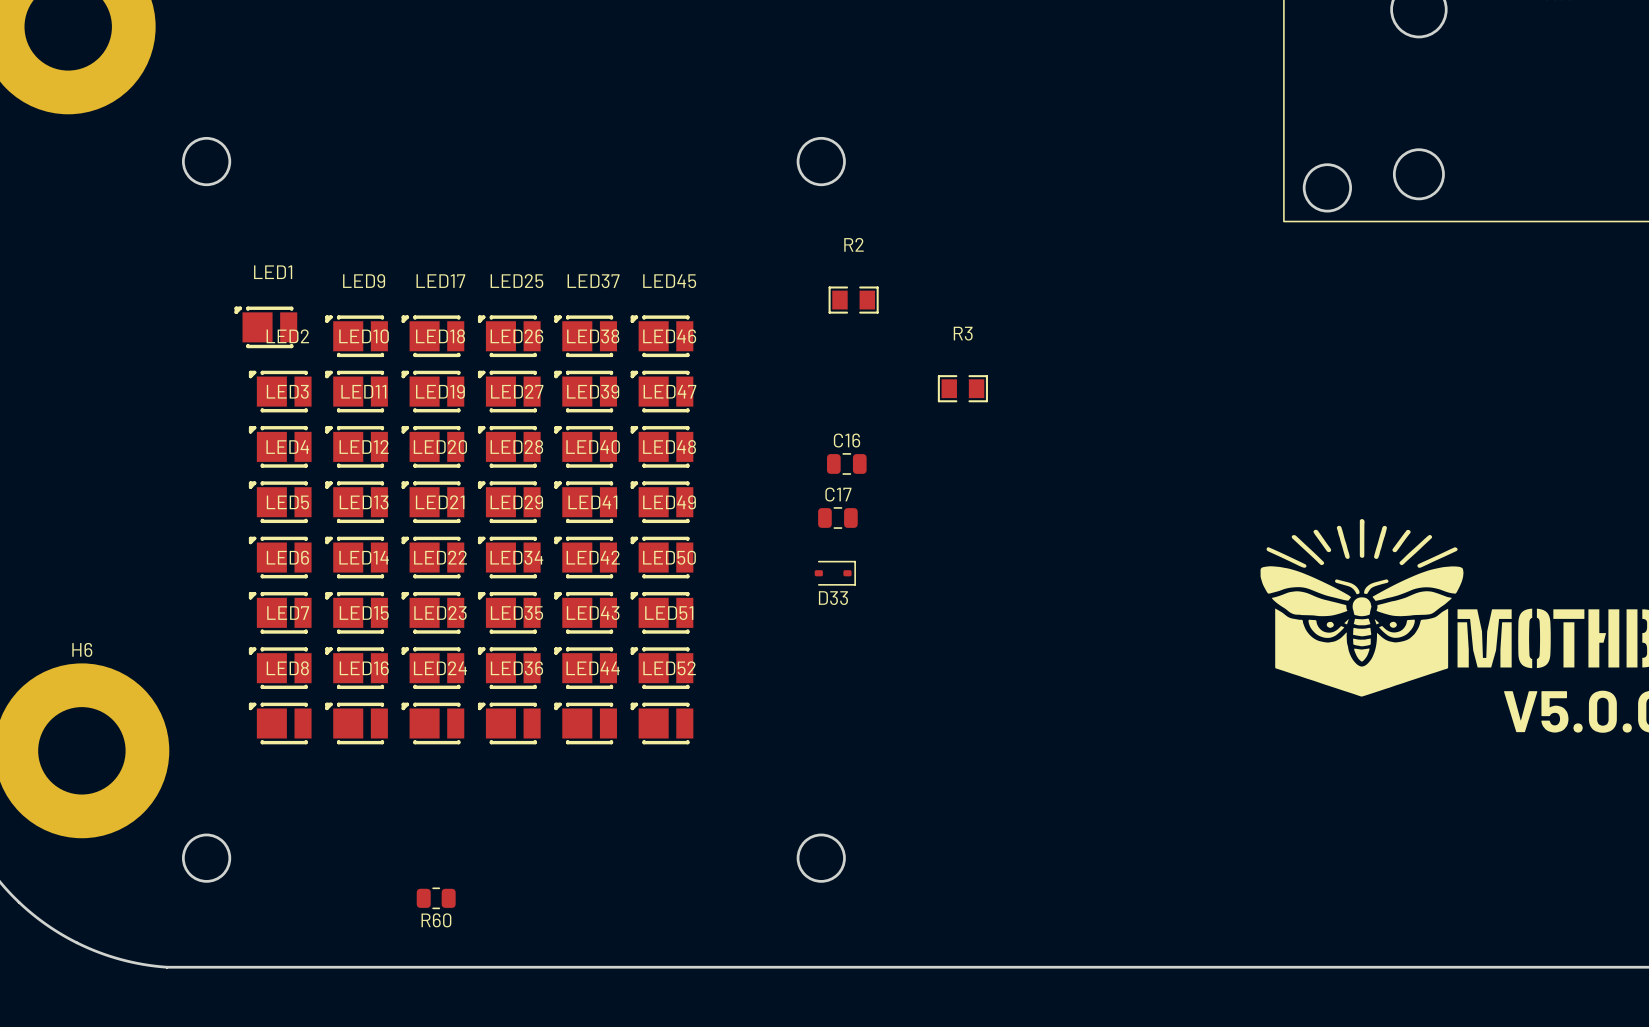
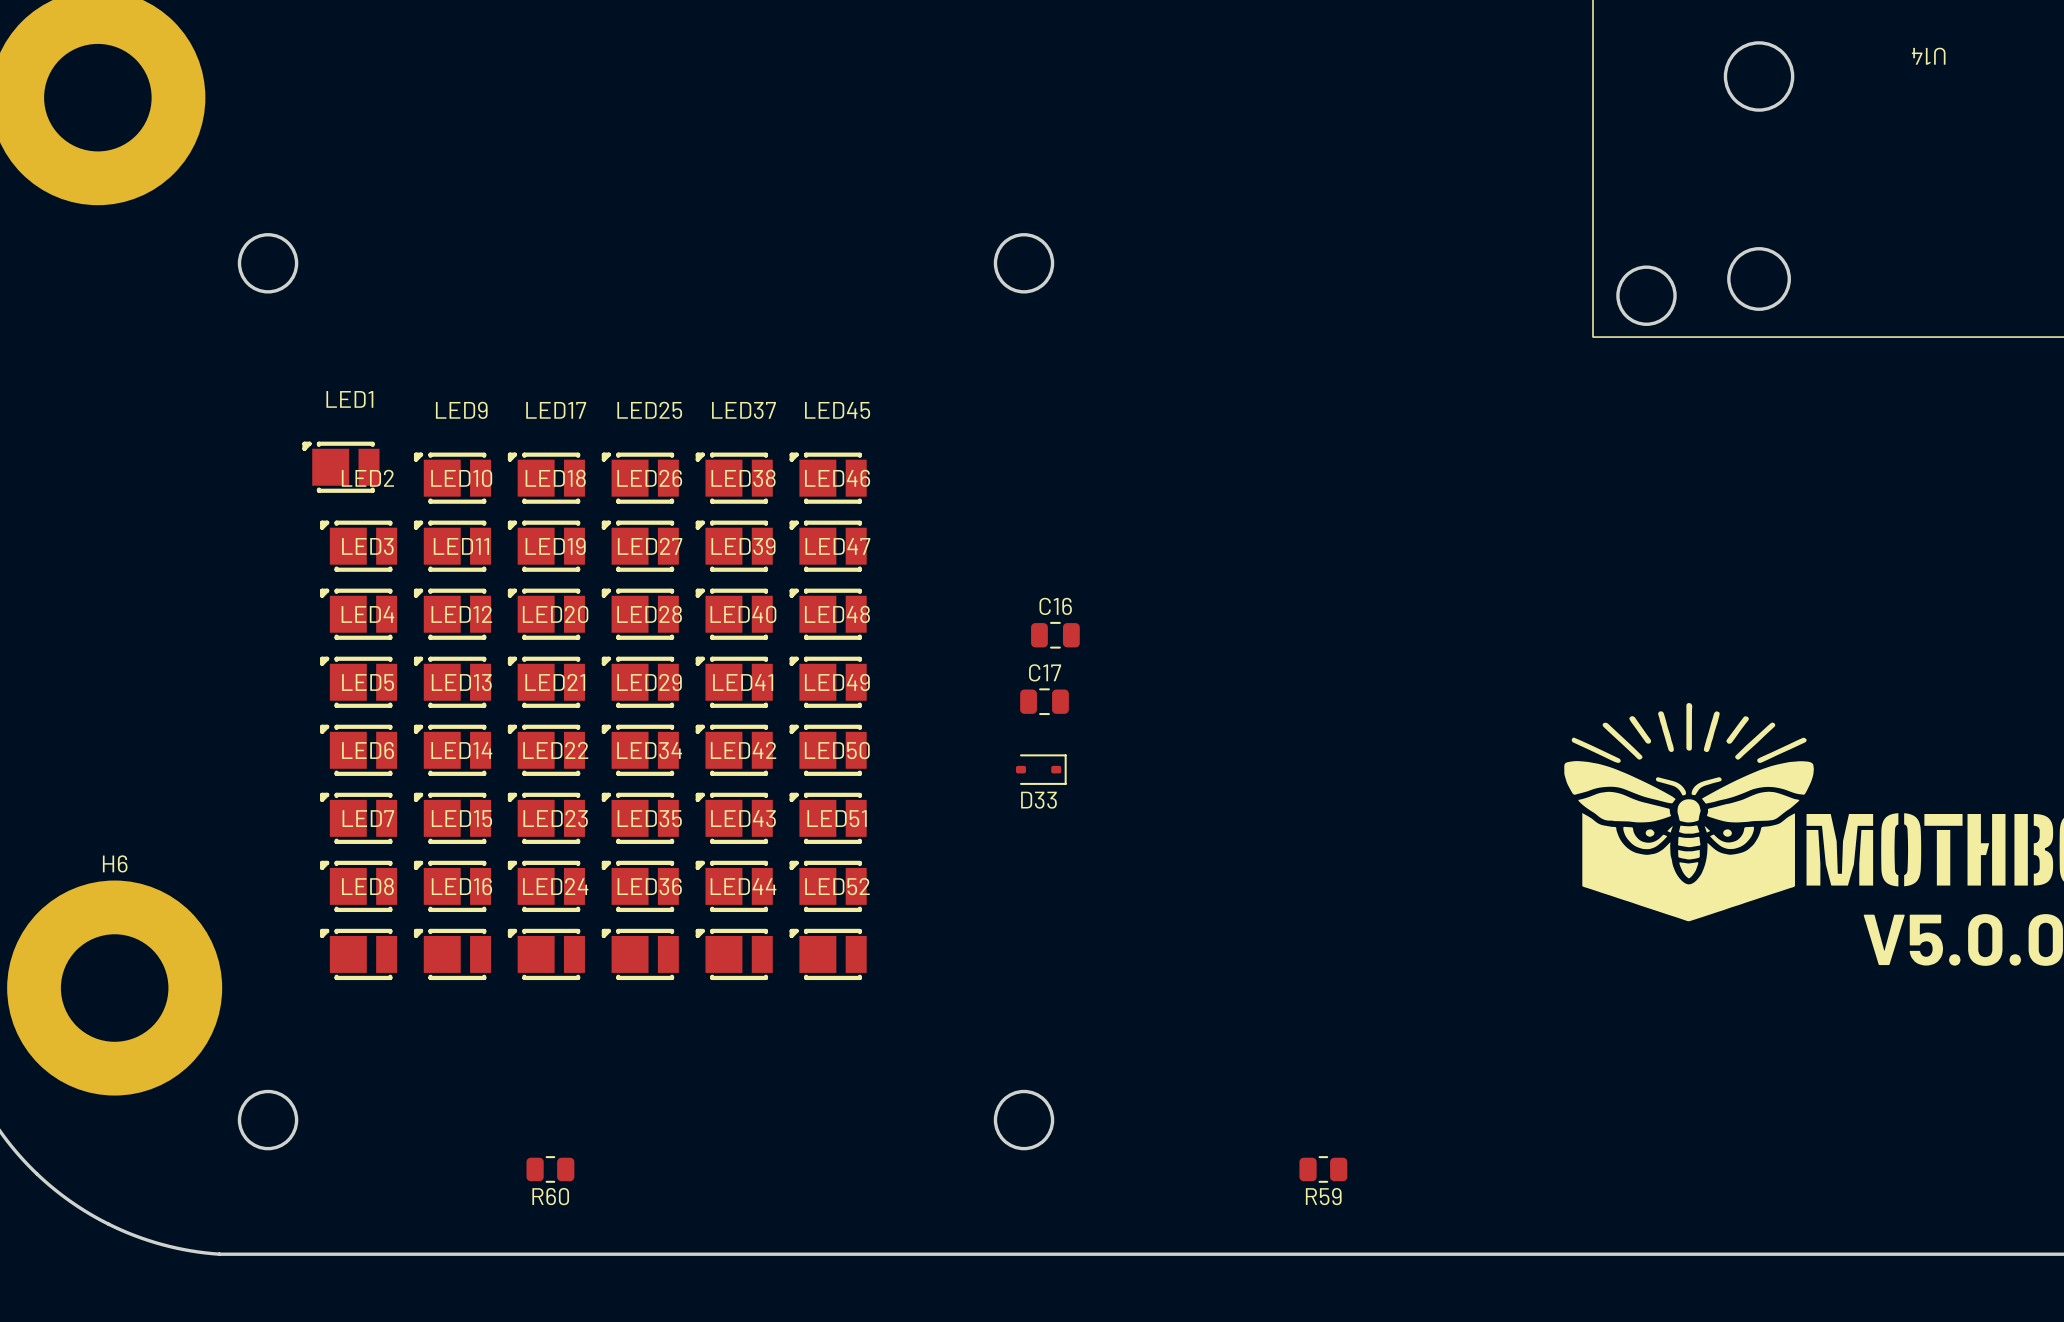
R2: (853, 300) -> none
R3: (962, 388) -> none
R59: none -> (1323, 1169)

